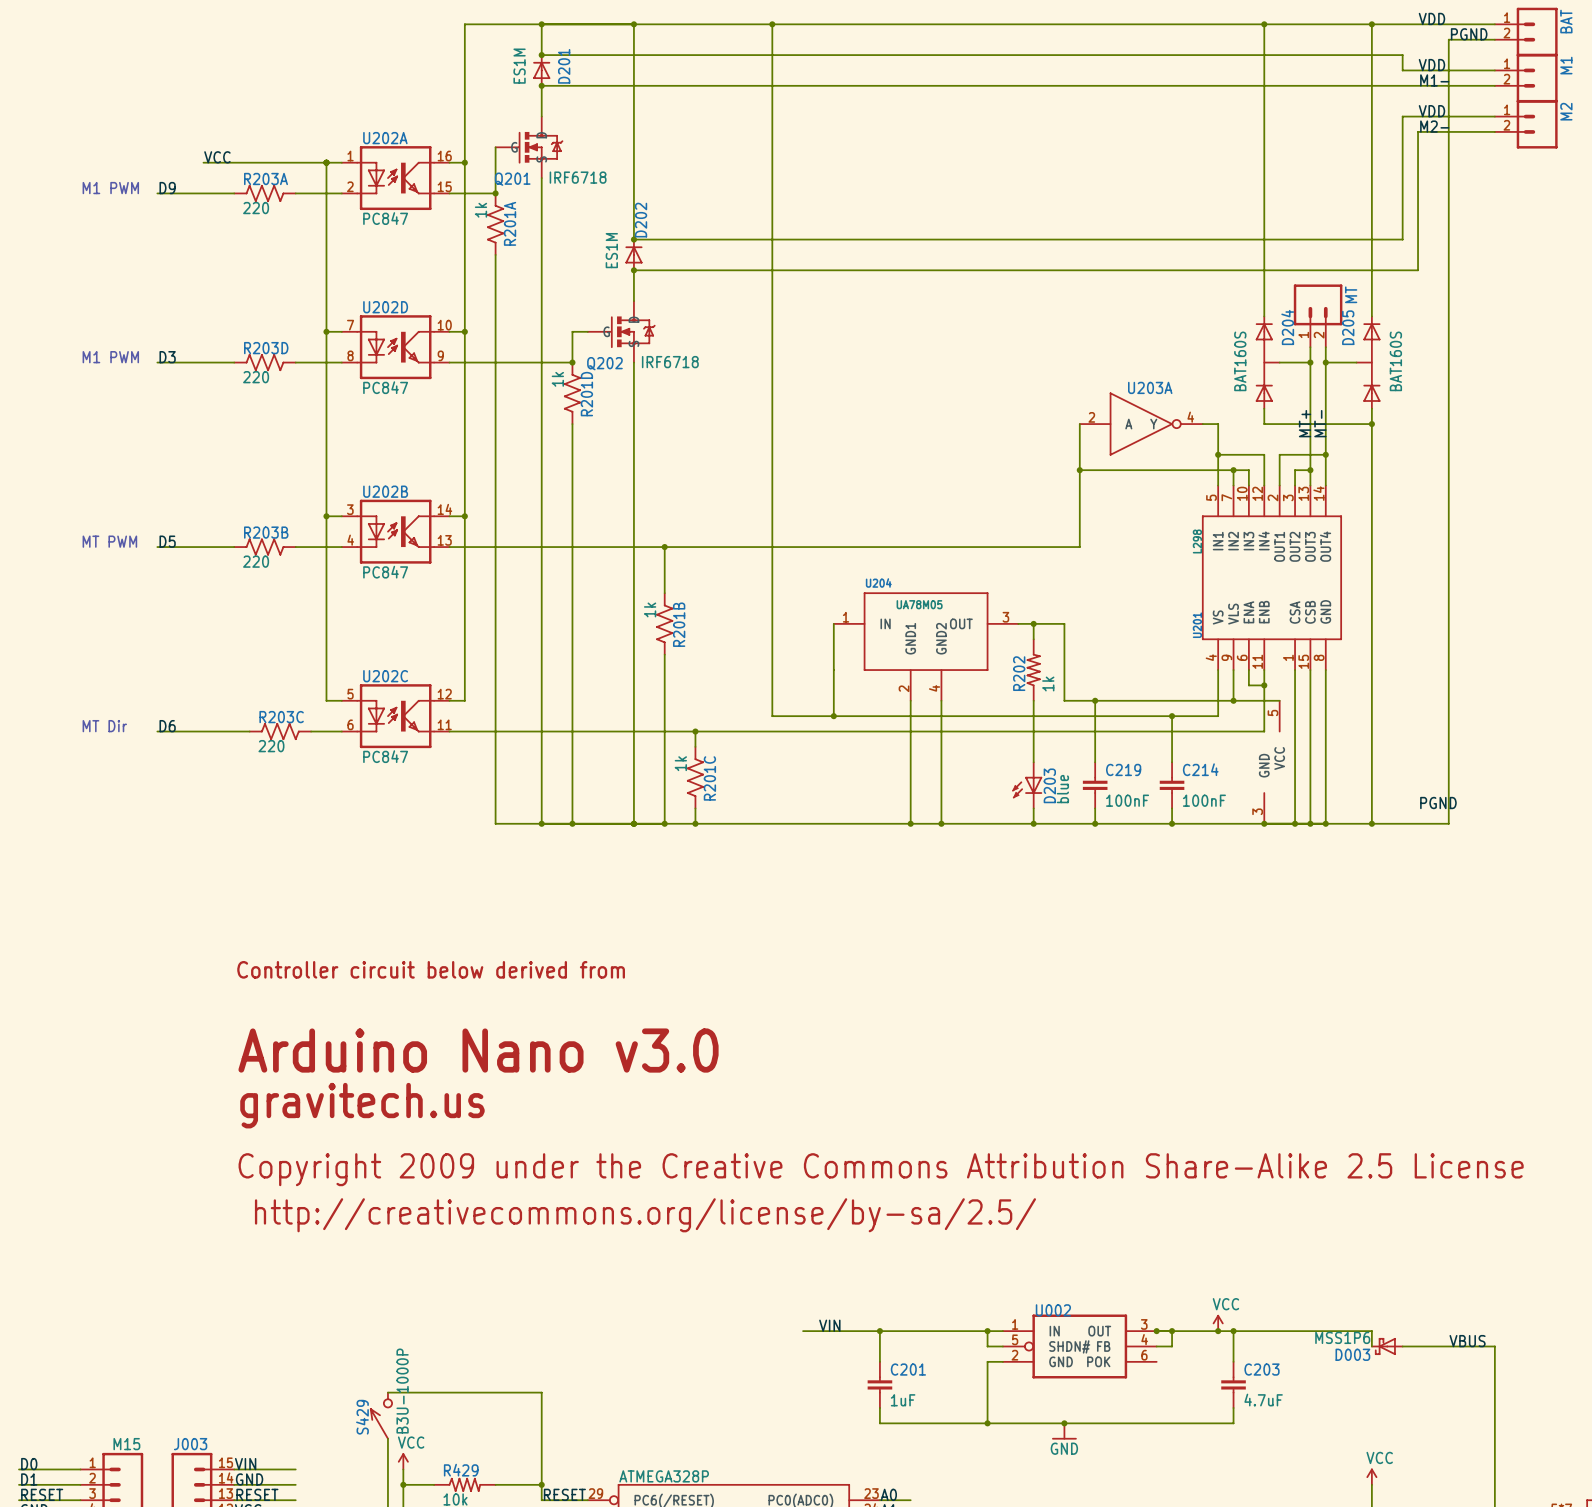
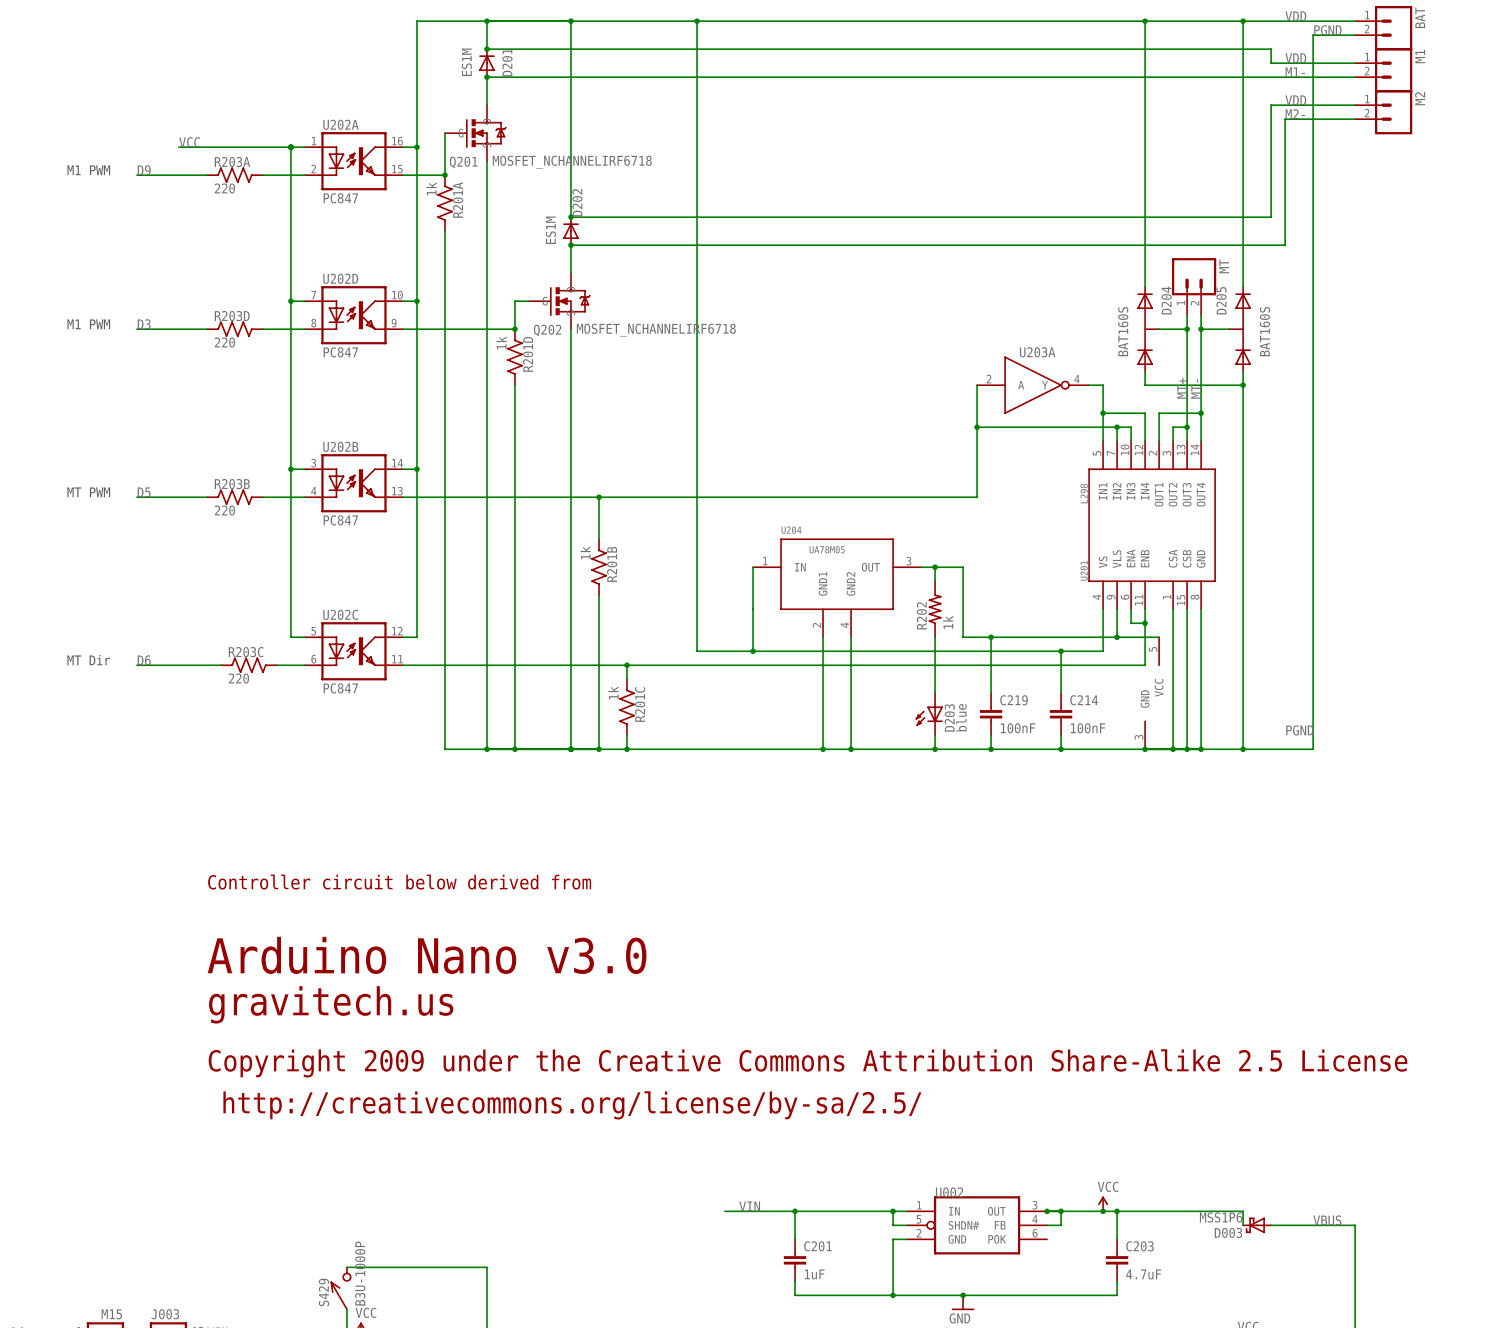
Q201 value: IRF6718 (578, 177) -> MOSFET_NCHANNELIRF6718 (572, 162)
Q202 value: IRF6718 (670, 362) -> MOSFET_NCHANNELIRF6718 (656, 330)

